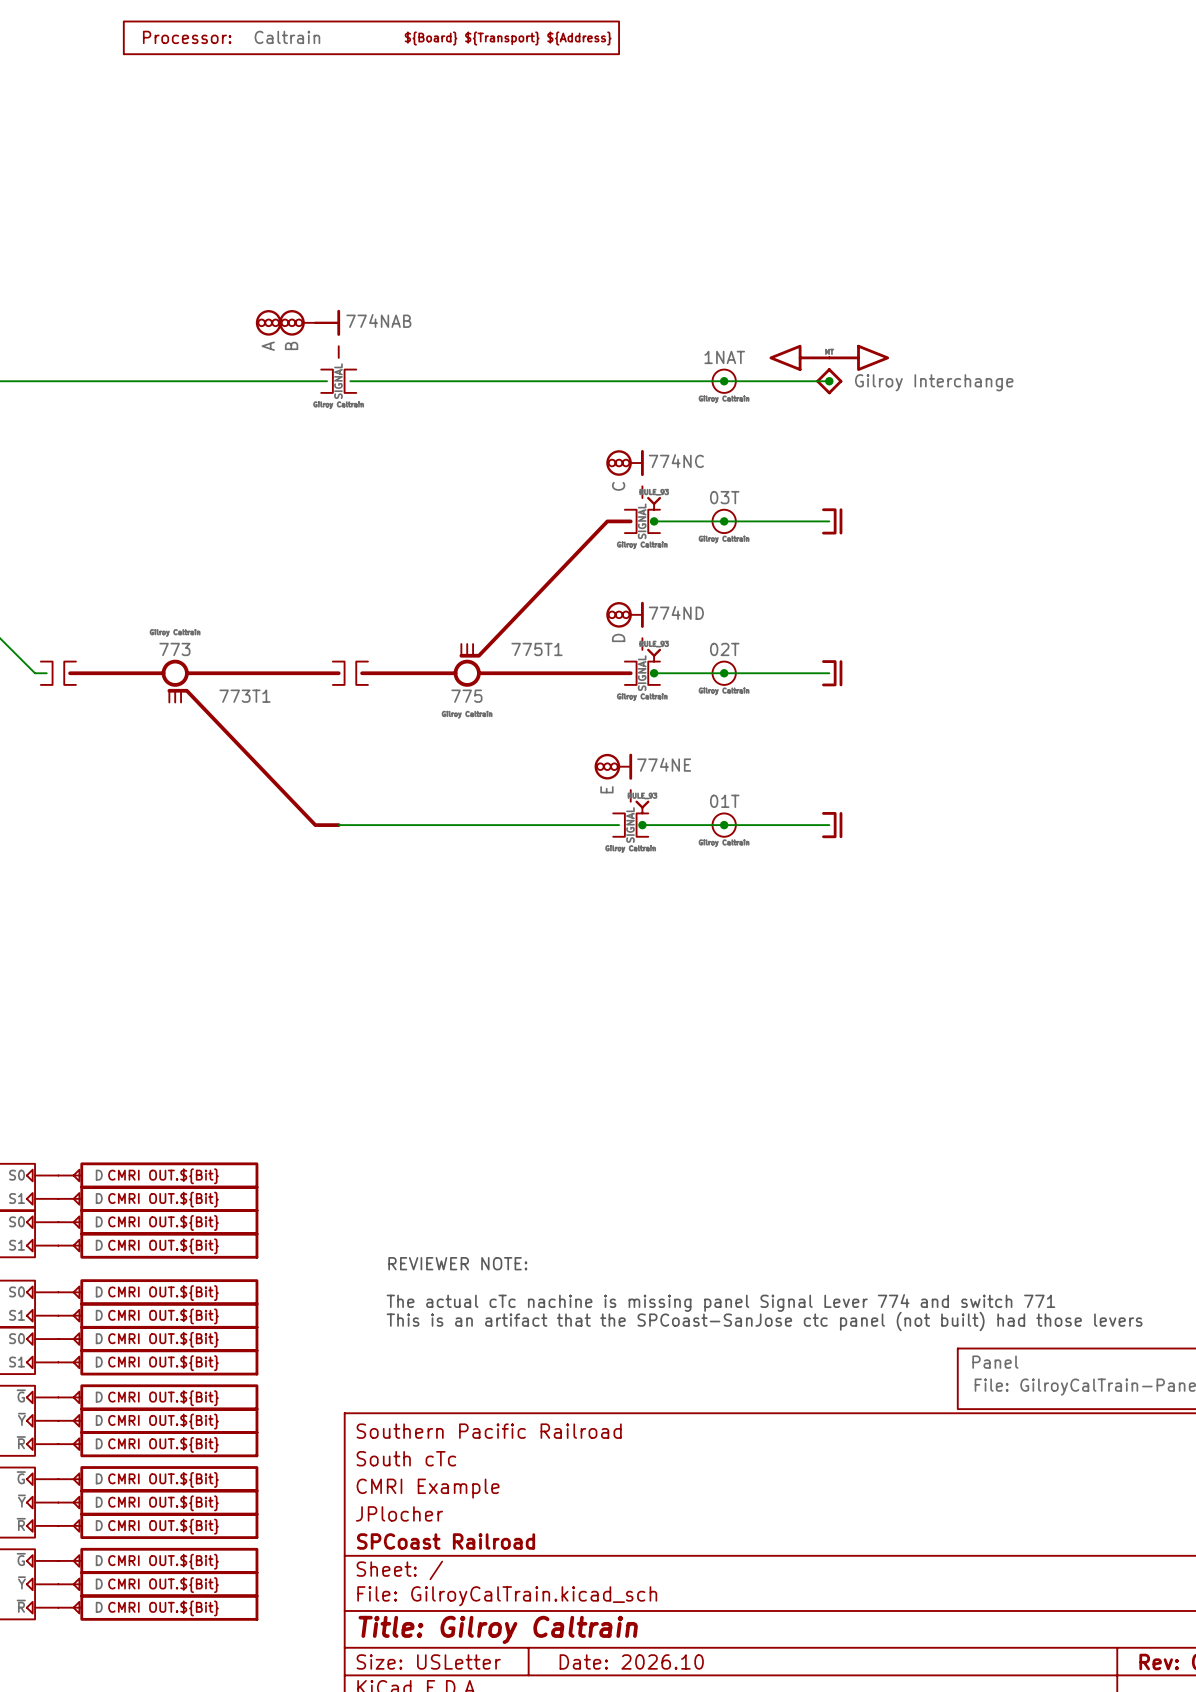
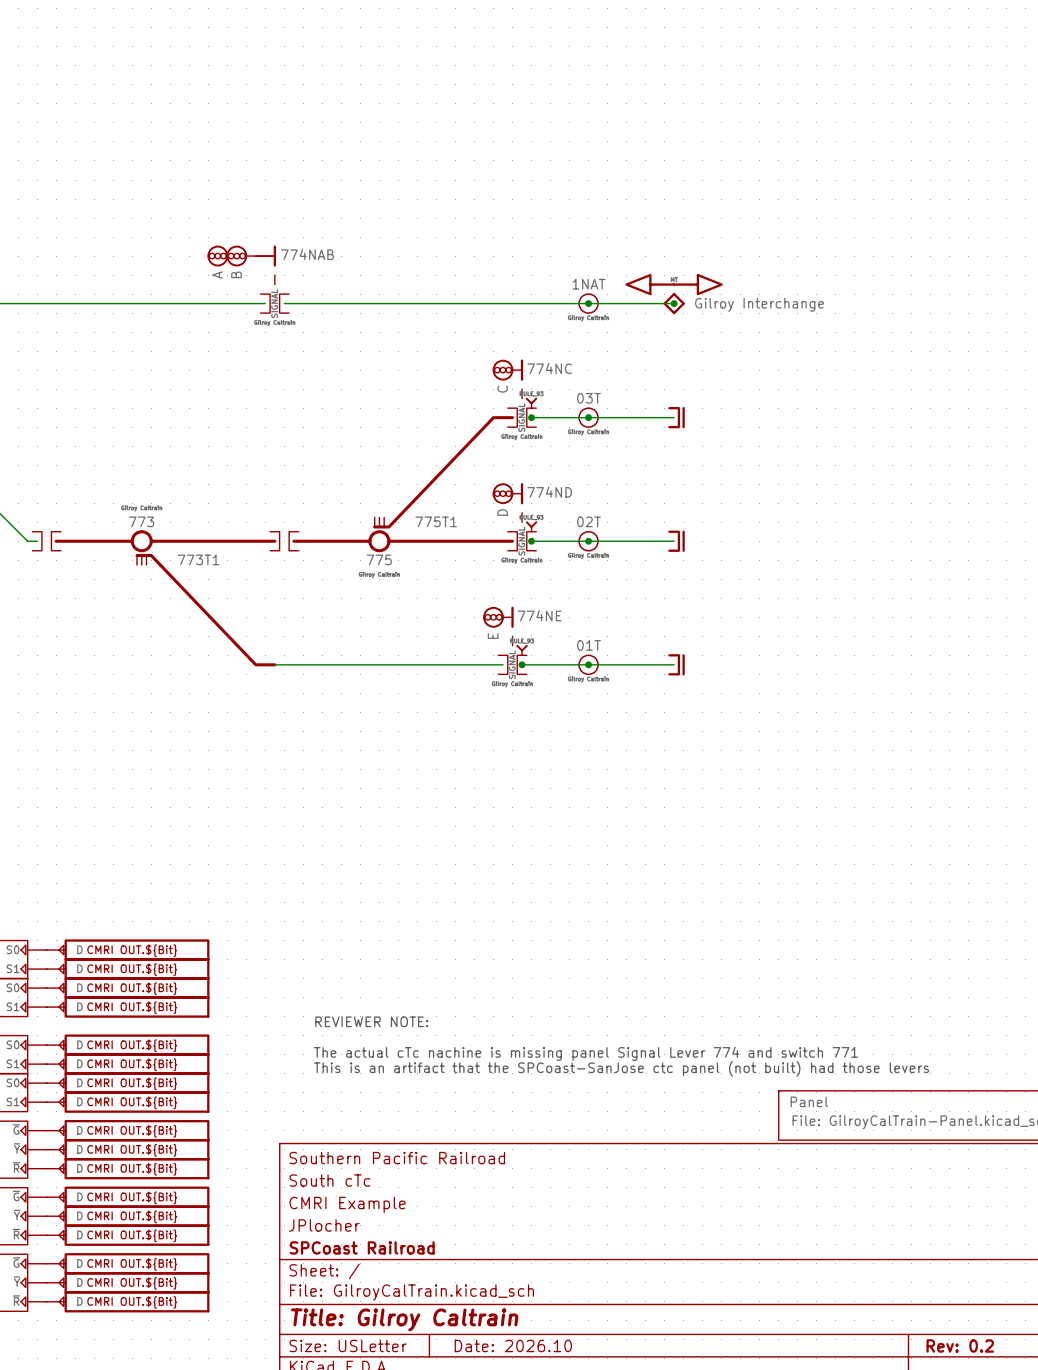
part: Caltrain (371, 37) -> none

